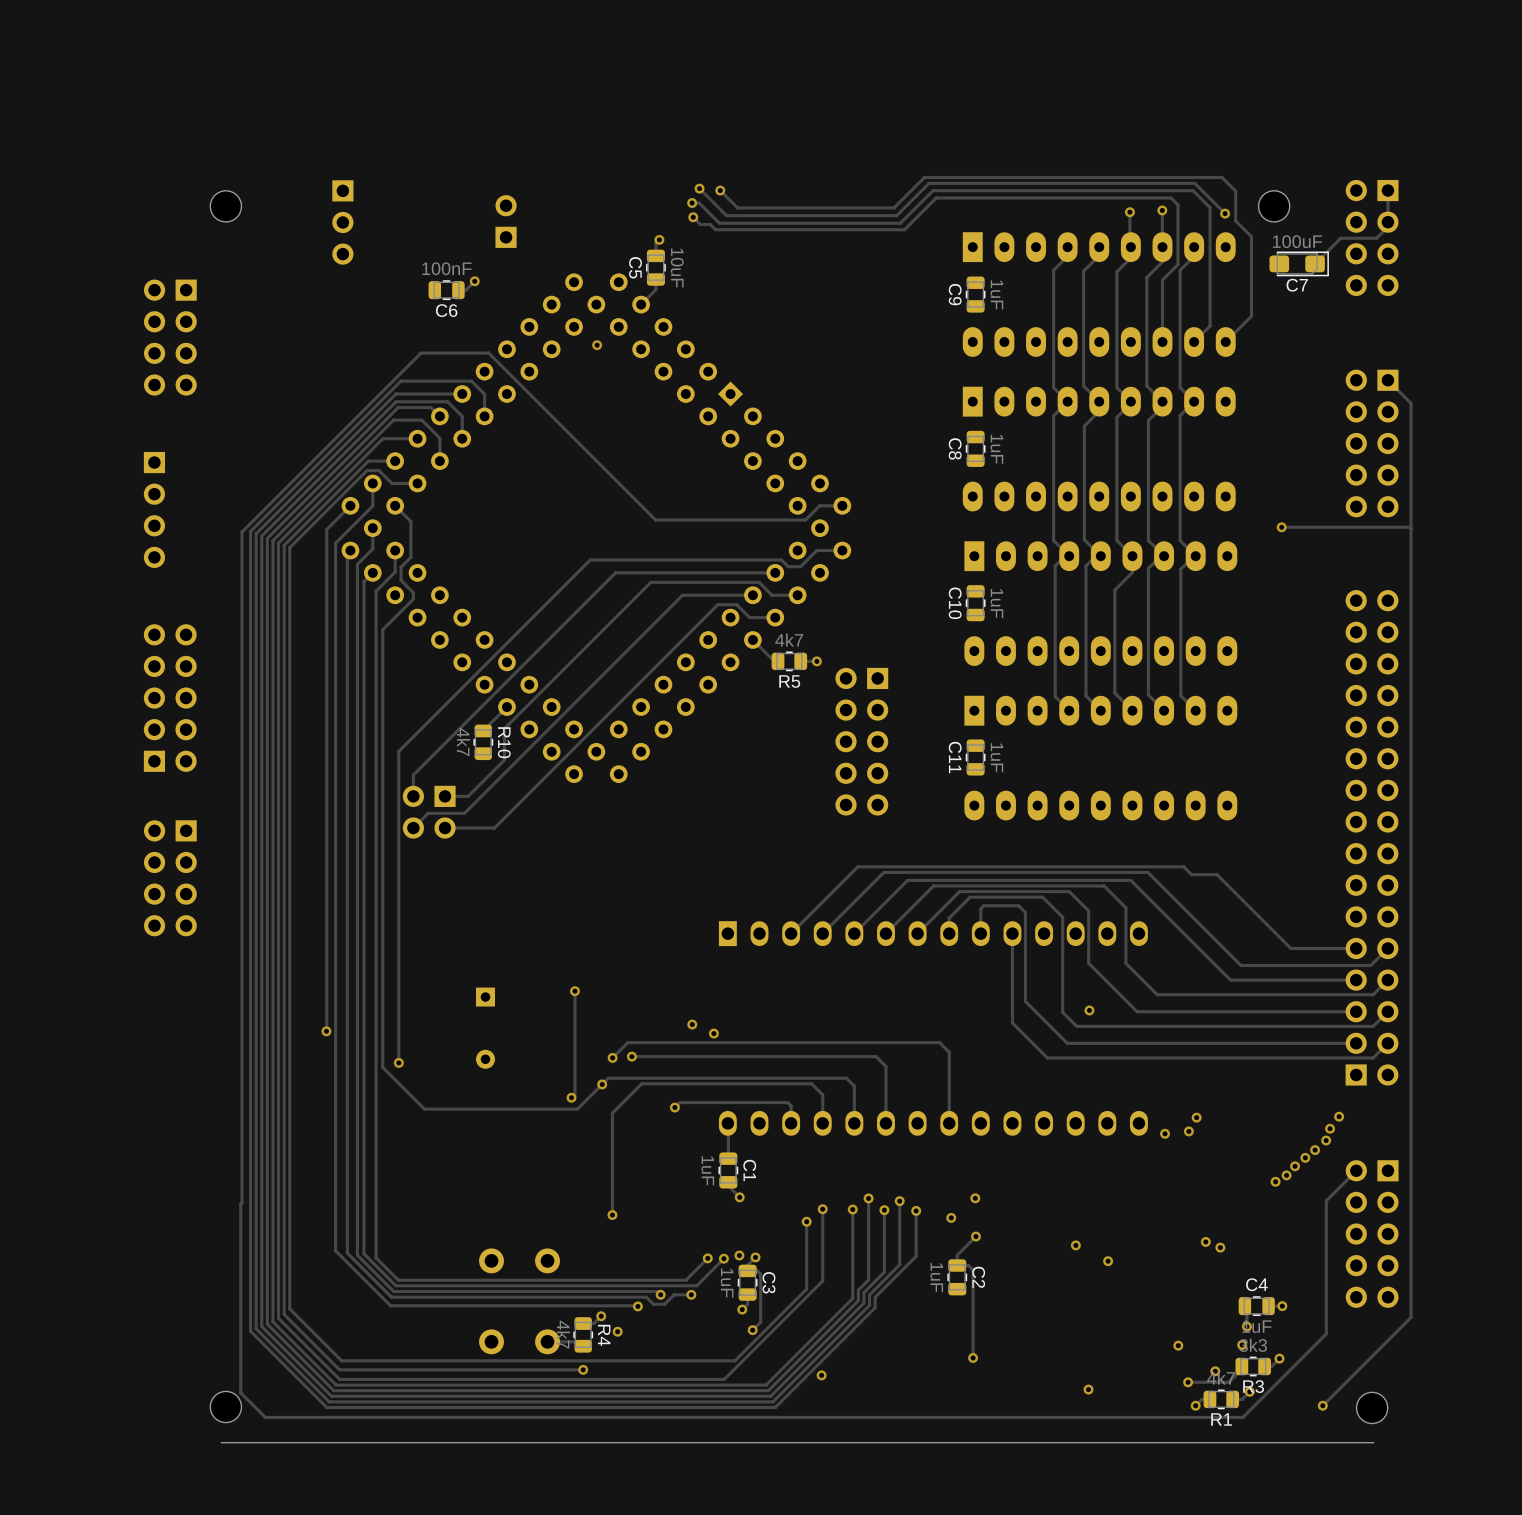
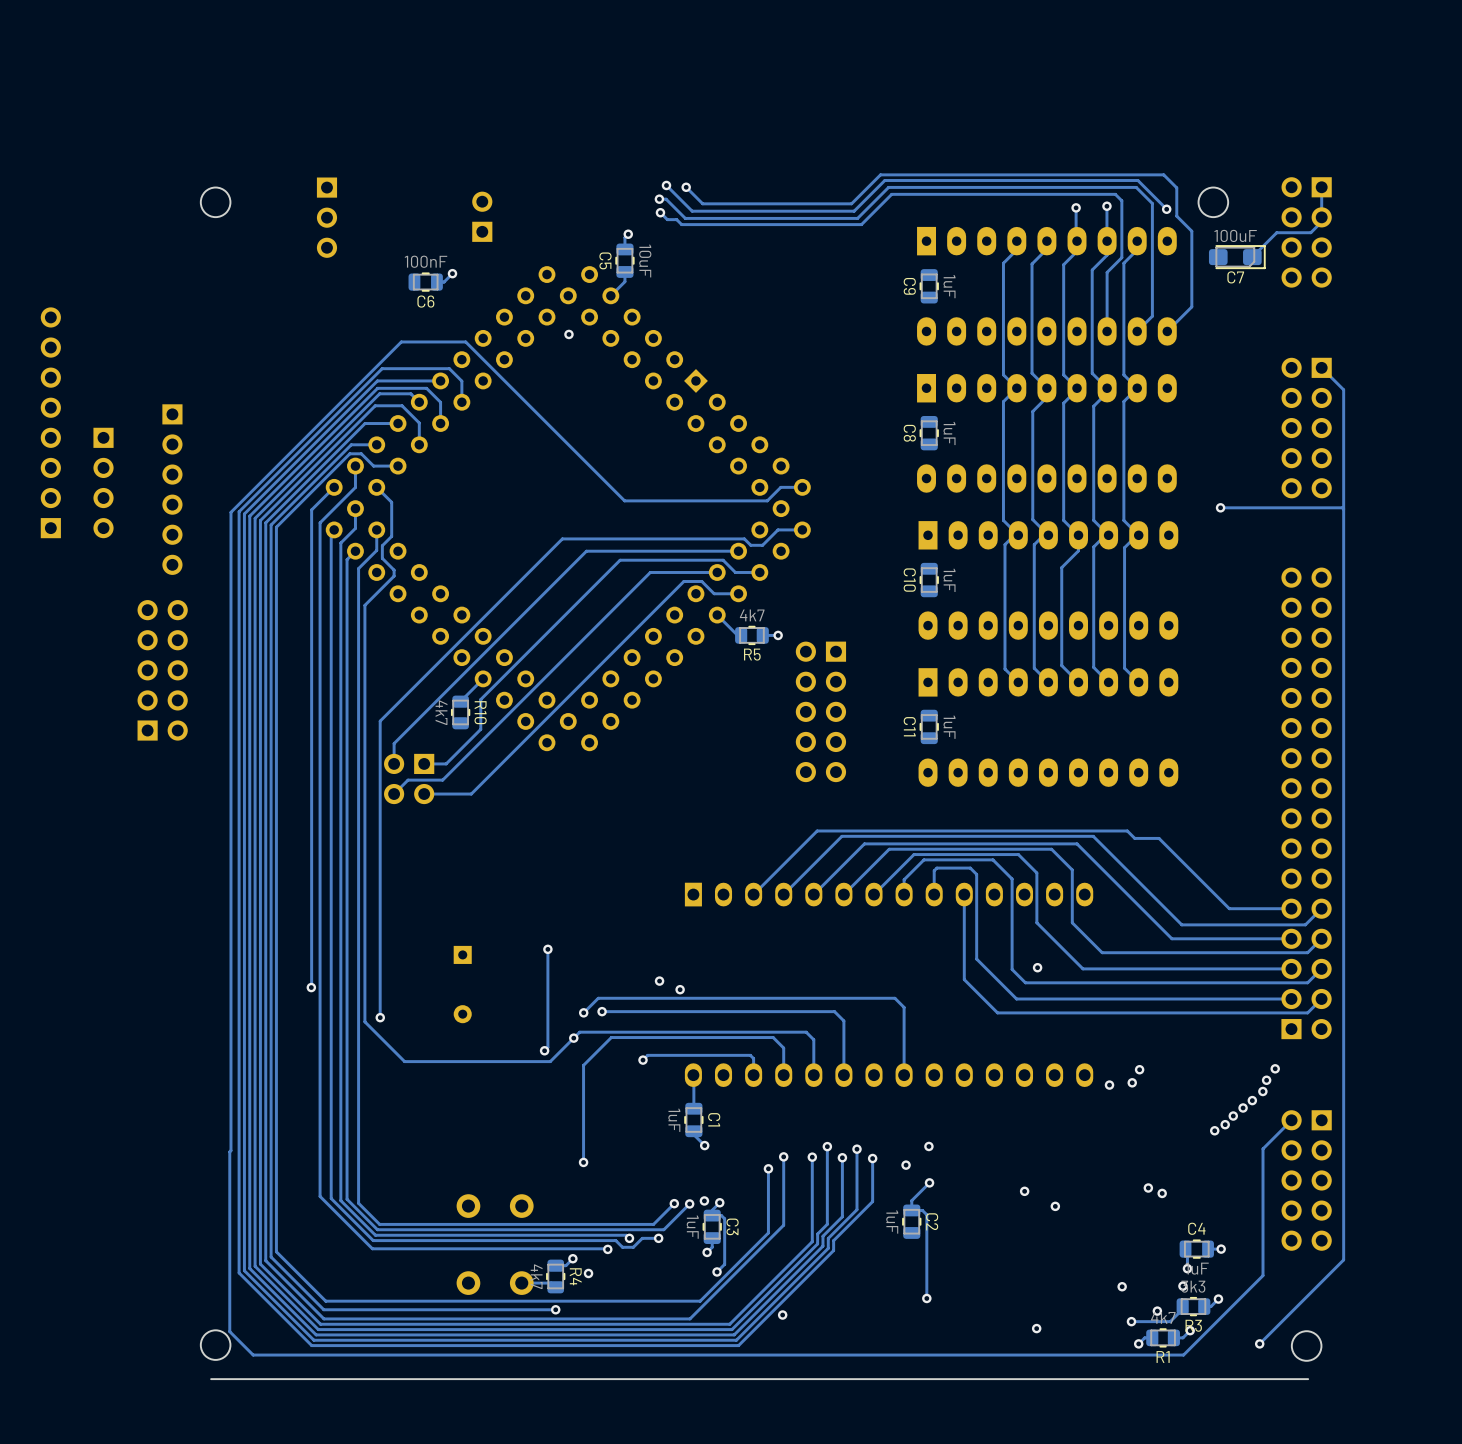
part: (170, 337) -> none
part: none -> (50, 422)
part: none -> (172, 489)
part position: (154, 509) -> (103, 482)
part: (170, 878) -> none

